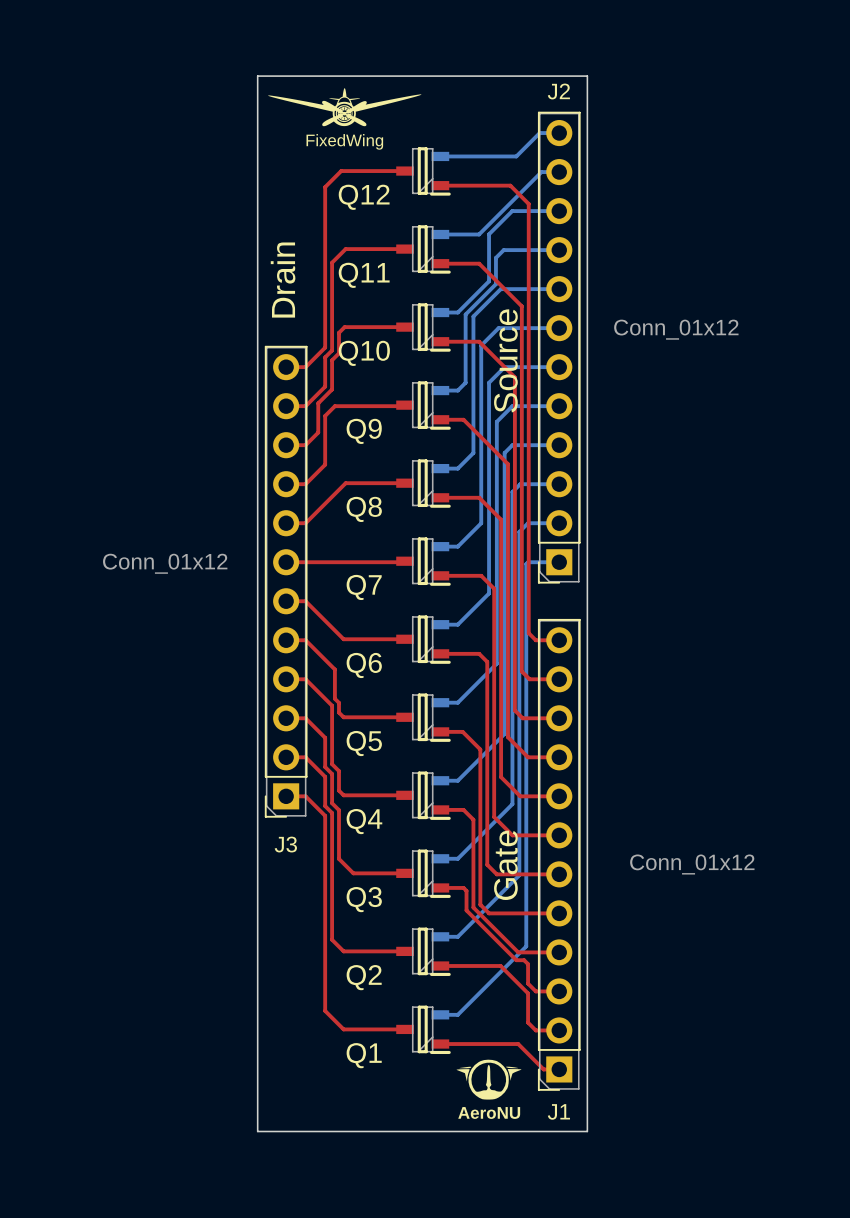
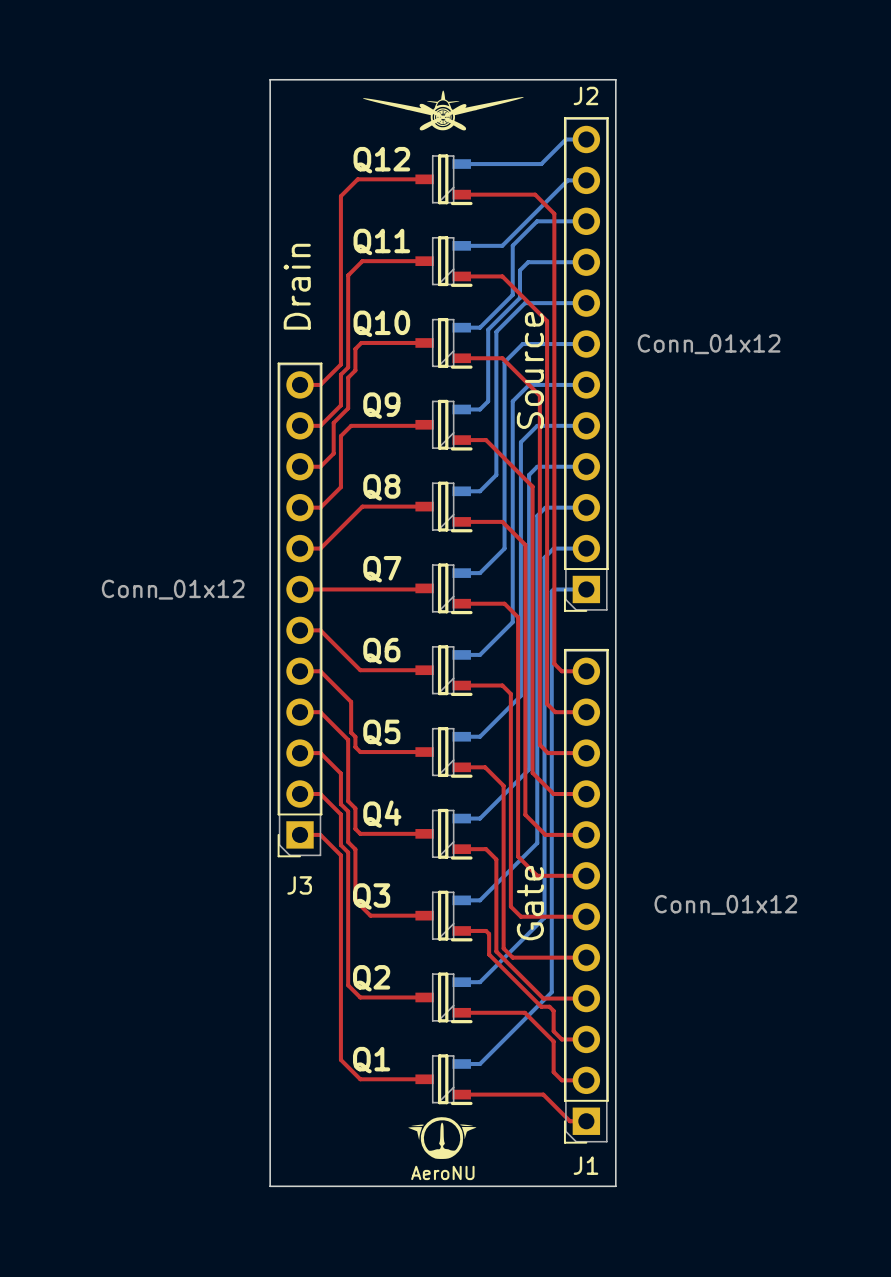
drawing: none -> [362, 90, 524, 131]
FixedWing: (344, 107) -> none
Q12 name position: Q12 (364, 197) -> Q12 (381, 160)
Q11 name position: Q11 (364, 275) -> Q11 (381, 241)
Q10 name position: Q10 (364, 353) -> Q10 (381, 323)
Q9 name position: Q9 (364, 431) -> Q9 (381, 405)
Q8 name position: Q8 (364, 509) -> Q8 (381, 487)
Q7 name position: Q7 (364, 587) -> Q7 (382, 569)
Q6 name position: Q6 (364, 665) -> Q6 (381, 651)
Q5 name position: Q5 (364, 743) -> Q5 (381, 732)
Q4 name position: Q4 (364, 821) -> Q4 (382, 814)
Q3 name position: Q3 (364, 899) -> Q3 (371, 896)
Q2 name position: Q2 (364, 977) -> Q2 (371, 978)
Q1 name position: Q1 (364, 1055) -> Q1 (371, 1060)
drawing position: (489, 1079) -> (442, 1138)
text position: AeroNU (489, 1112) -> AeroNU (442, 1172)

